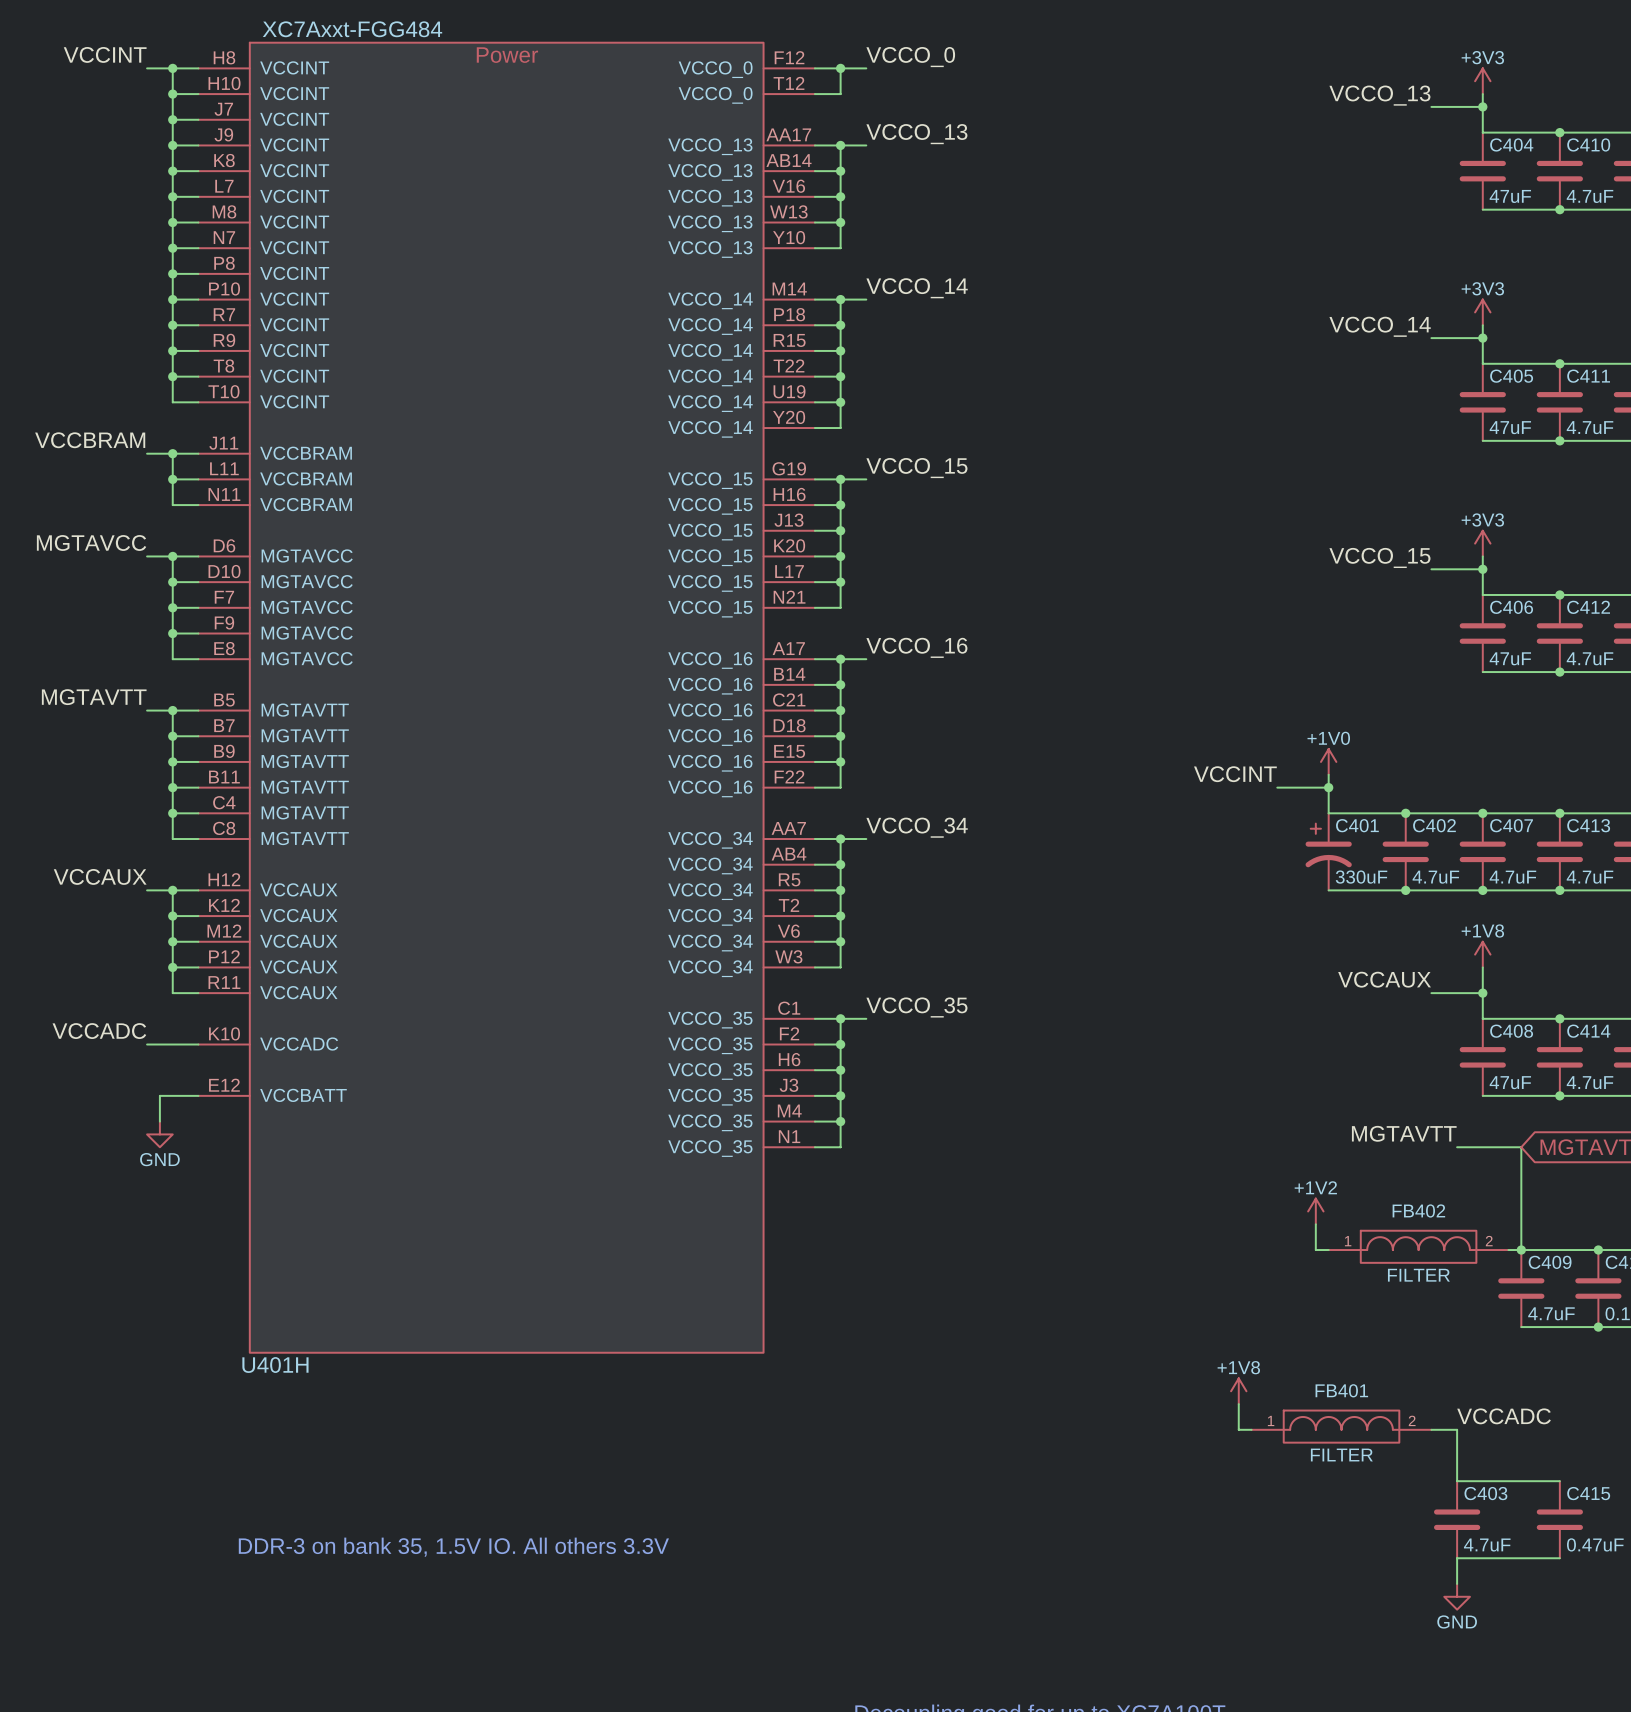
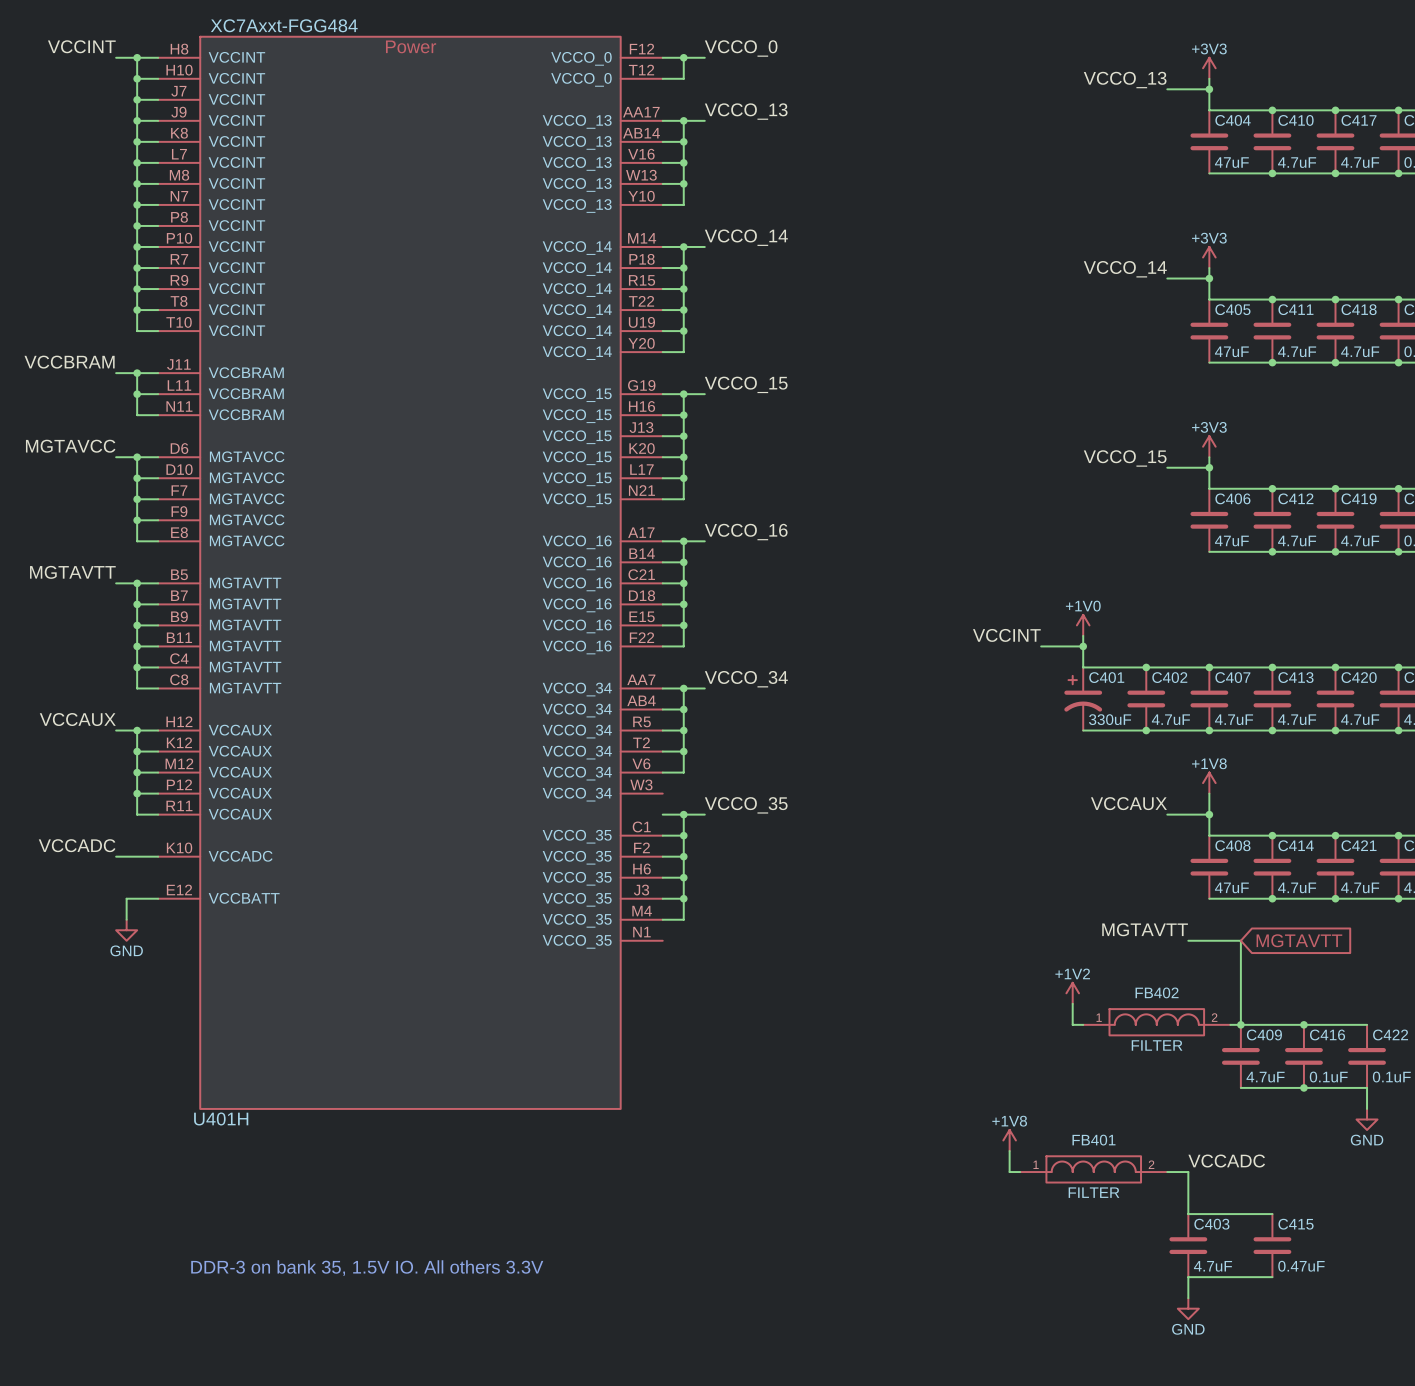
wire: (840, 941) (840, 967) (814, 967) -> none
junction position: (840, 941) -> (683, 814)
wire: none -> (662, 814) (704, 814)
label position: VCCO_35 (916, 1007) -> VCCO_35 (746, 805)
wire: (840, 1018) (866, 1018) -> (683, 835) (683, 814)
wire: (840, 1121) (840, 1147) (814, 1147) -> none
junction: (840, 1121) -> none

